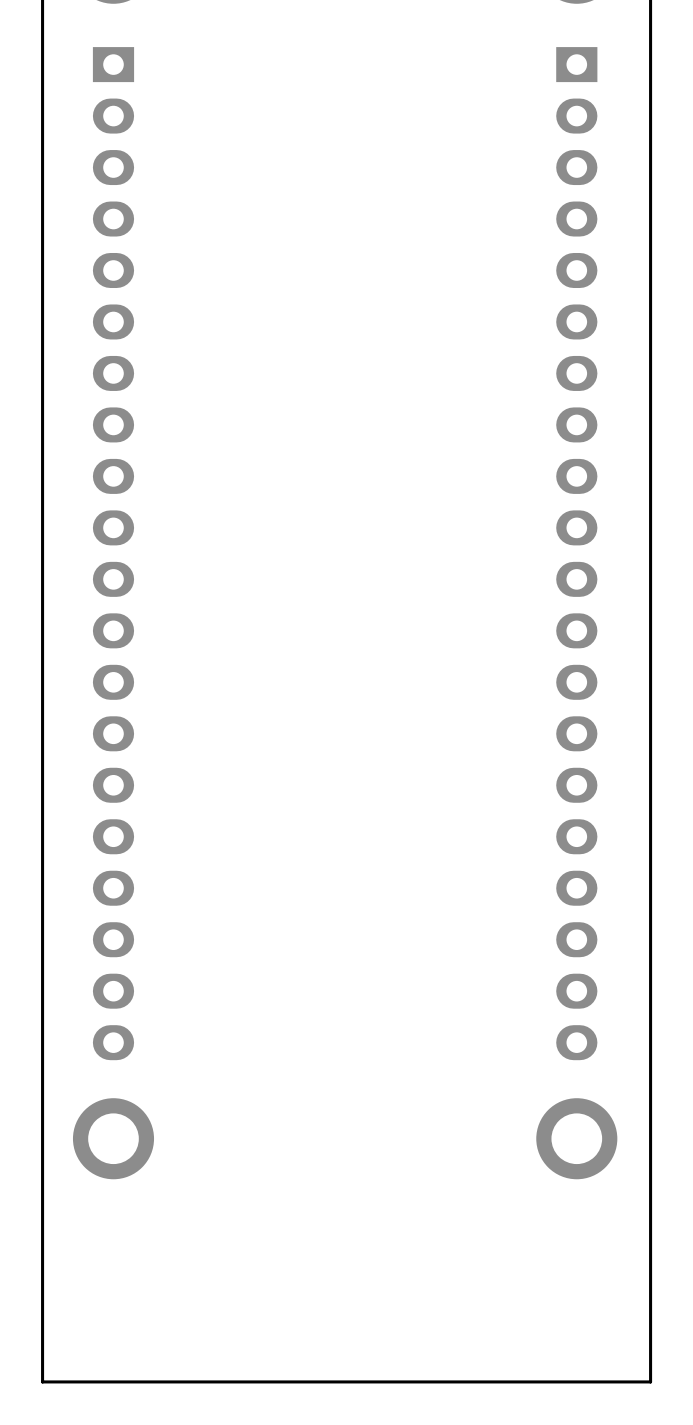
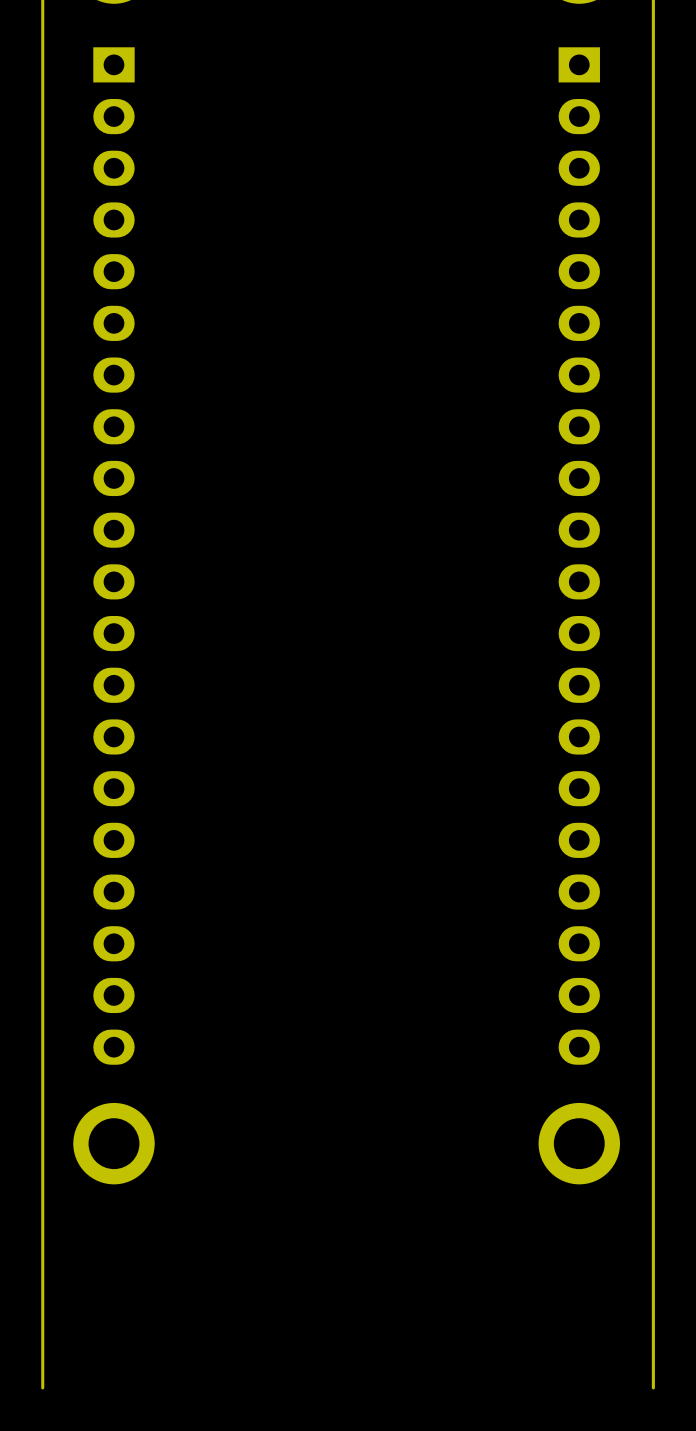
board edge: (650, 1381) (42, 1381) -> none

